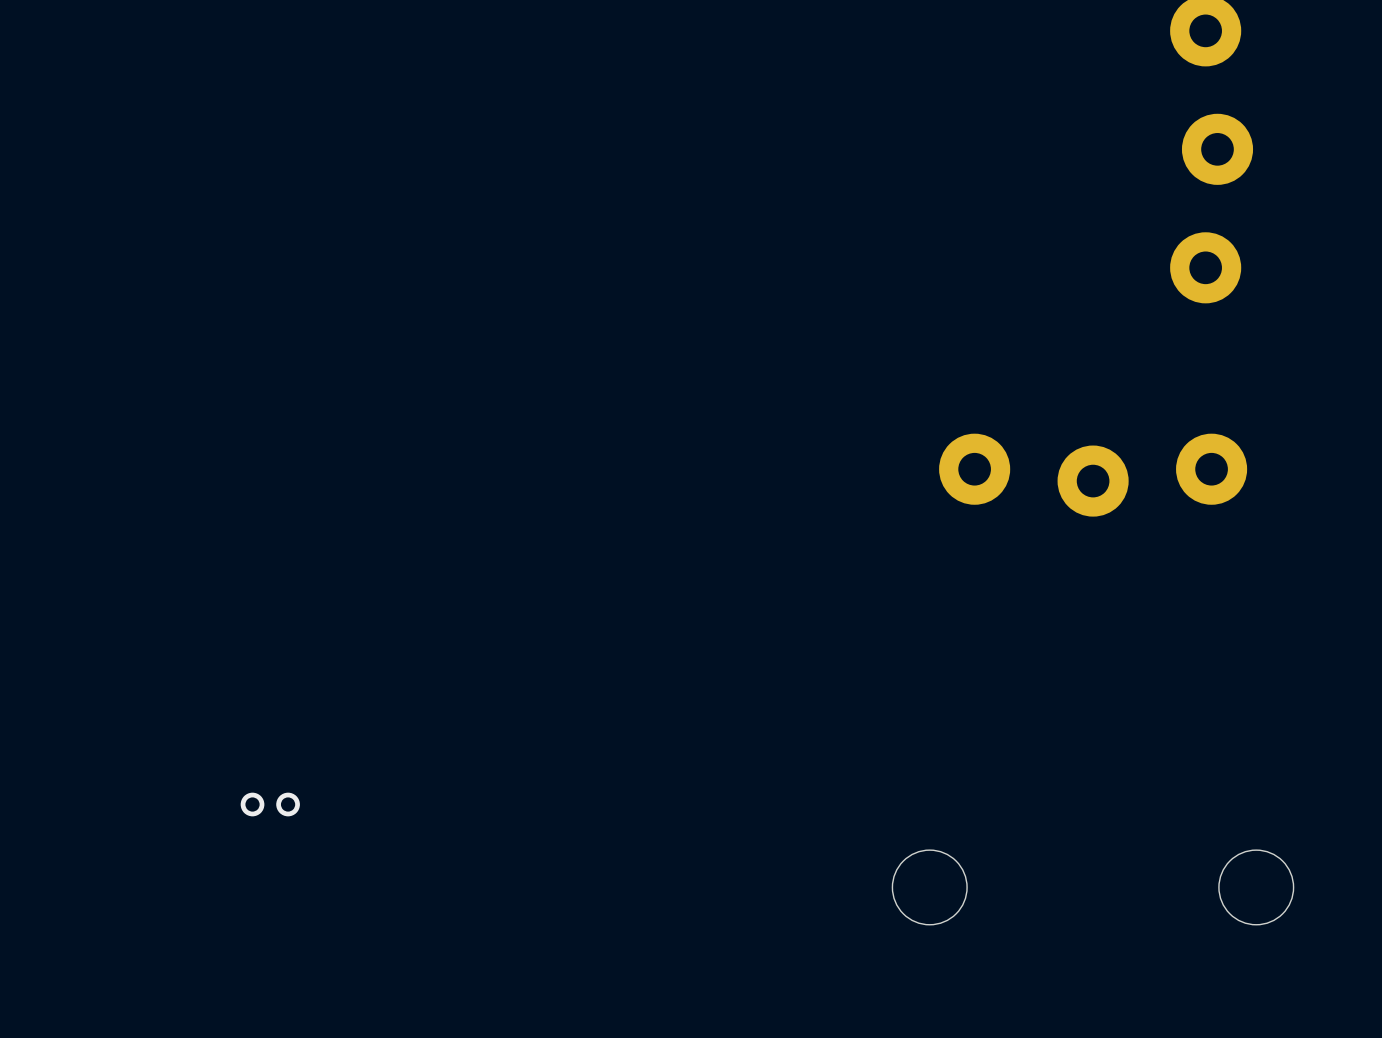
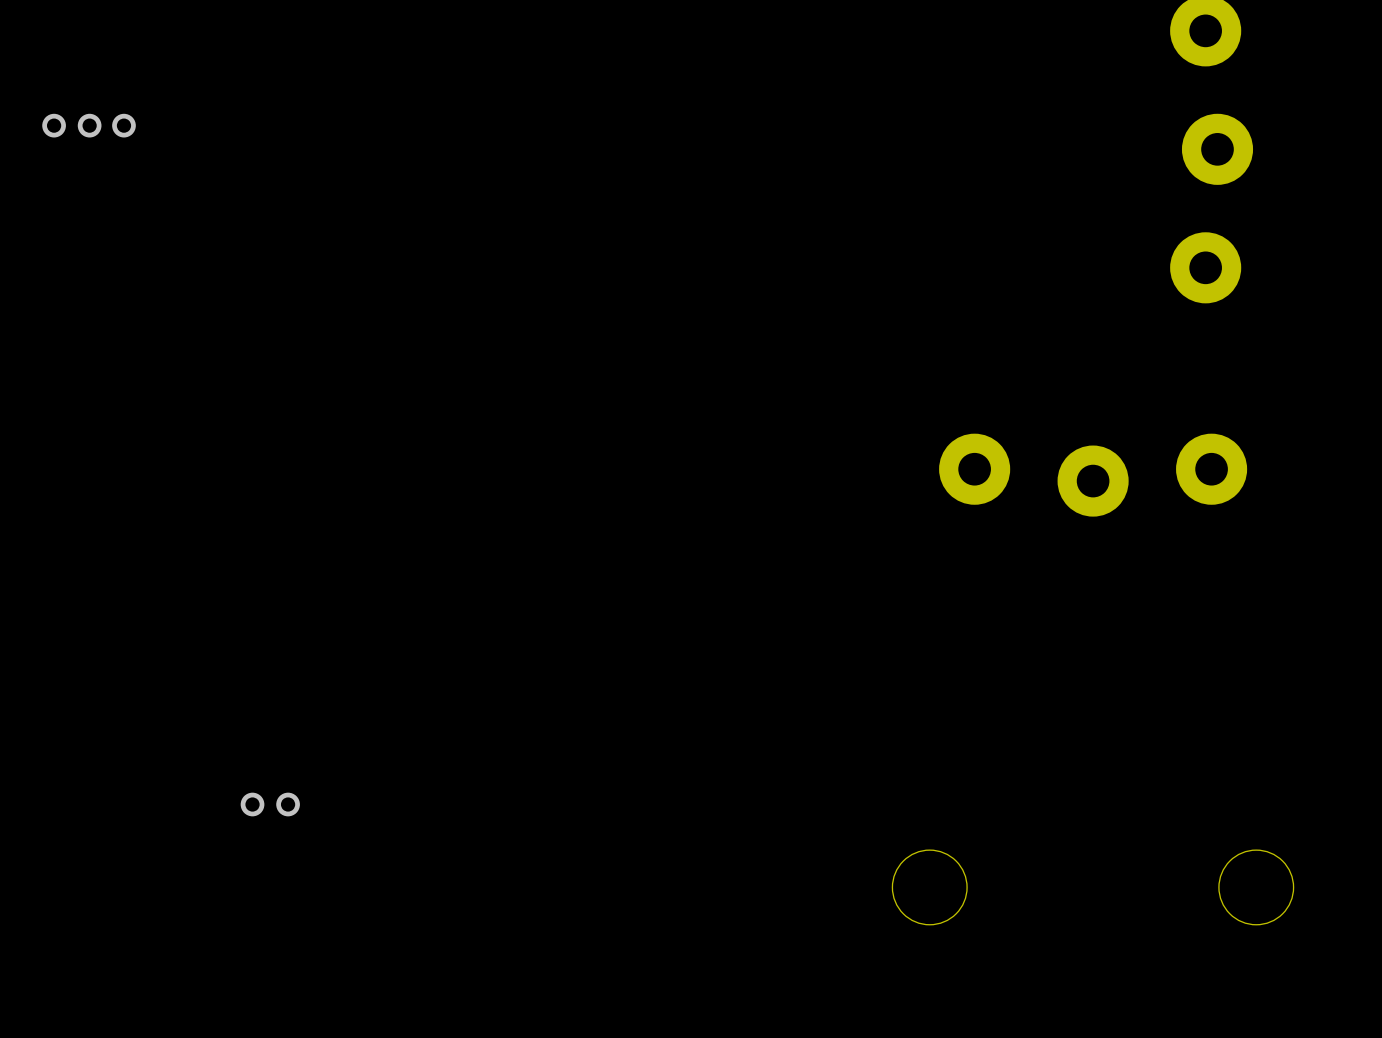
via: none -> (54, 125)
via: none -> (89, 125)
via: none -> (123, 125)

